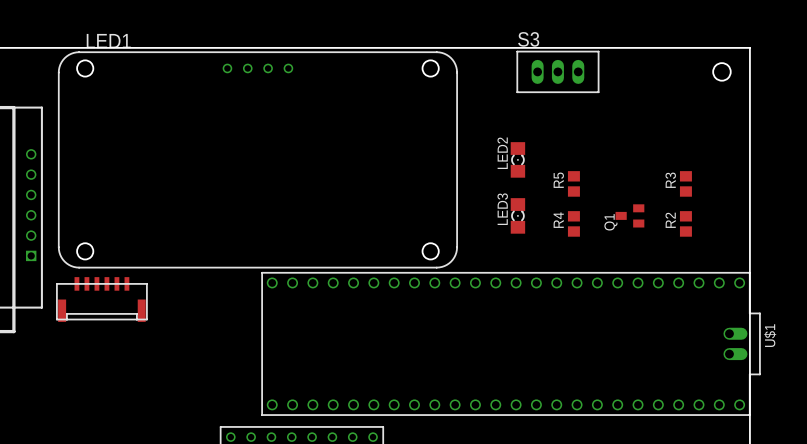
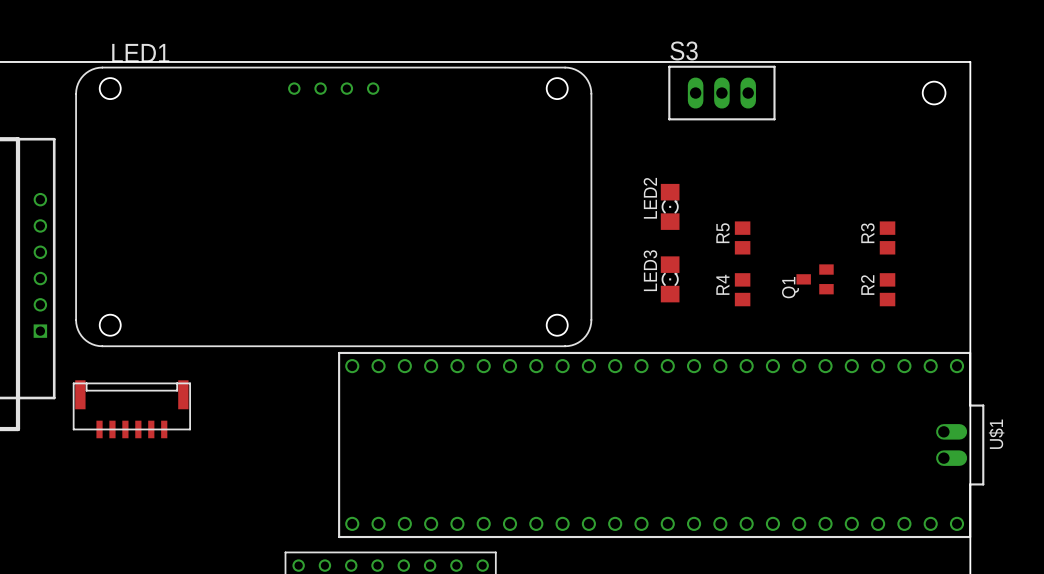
part rotation: 0° (101, 299) -> 180° (131, 409)

